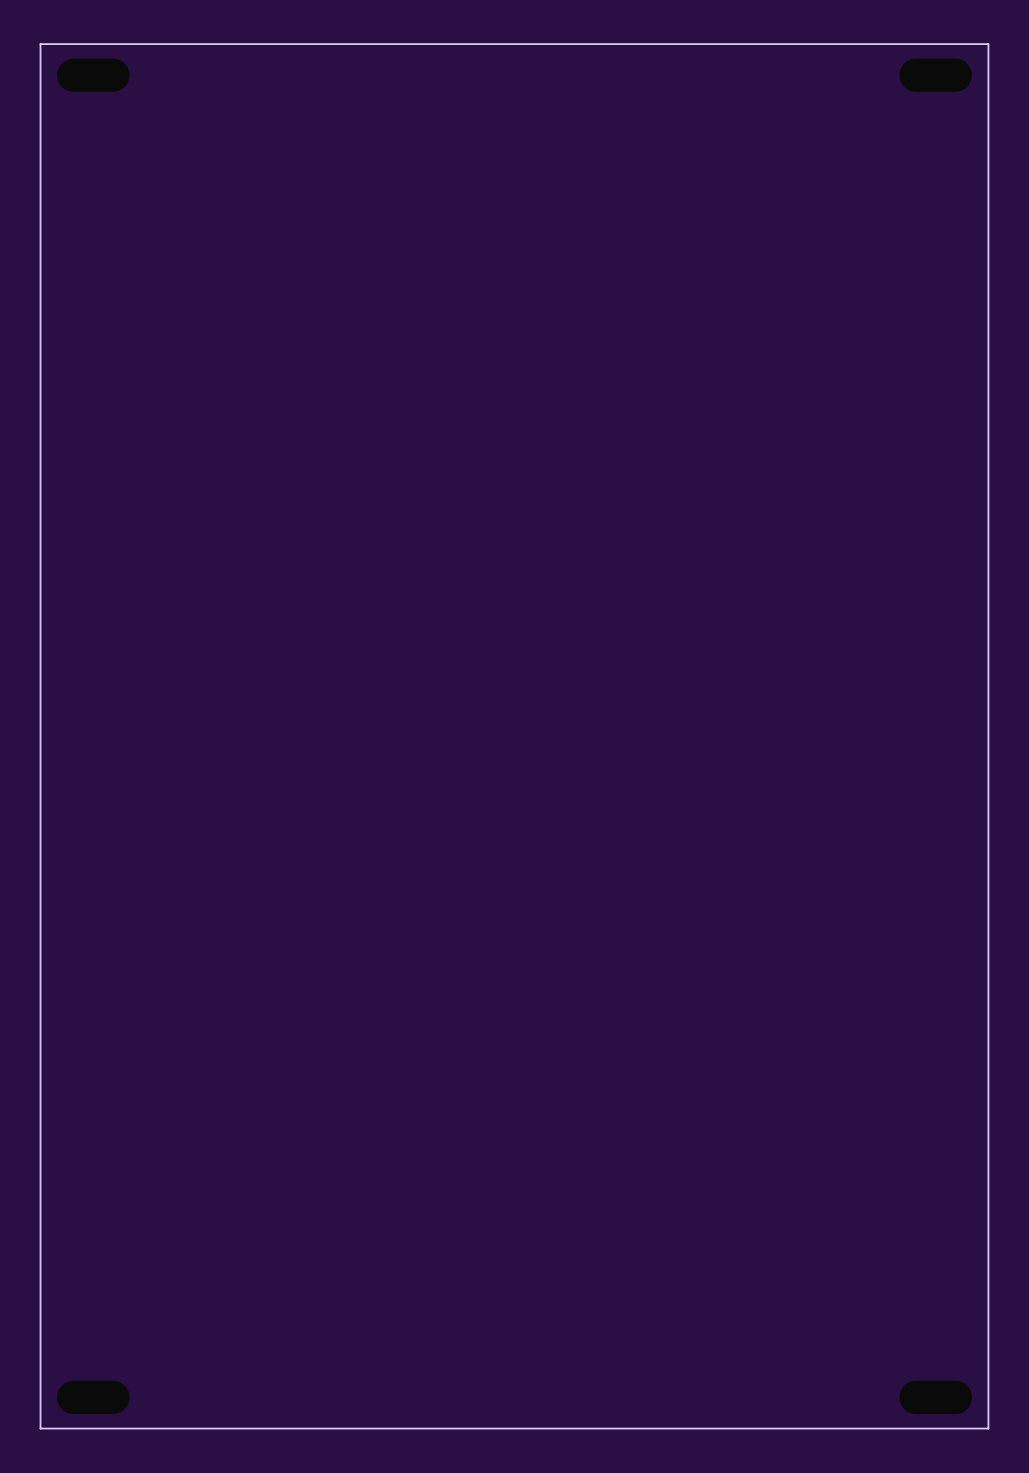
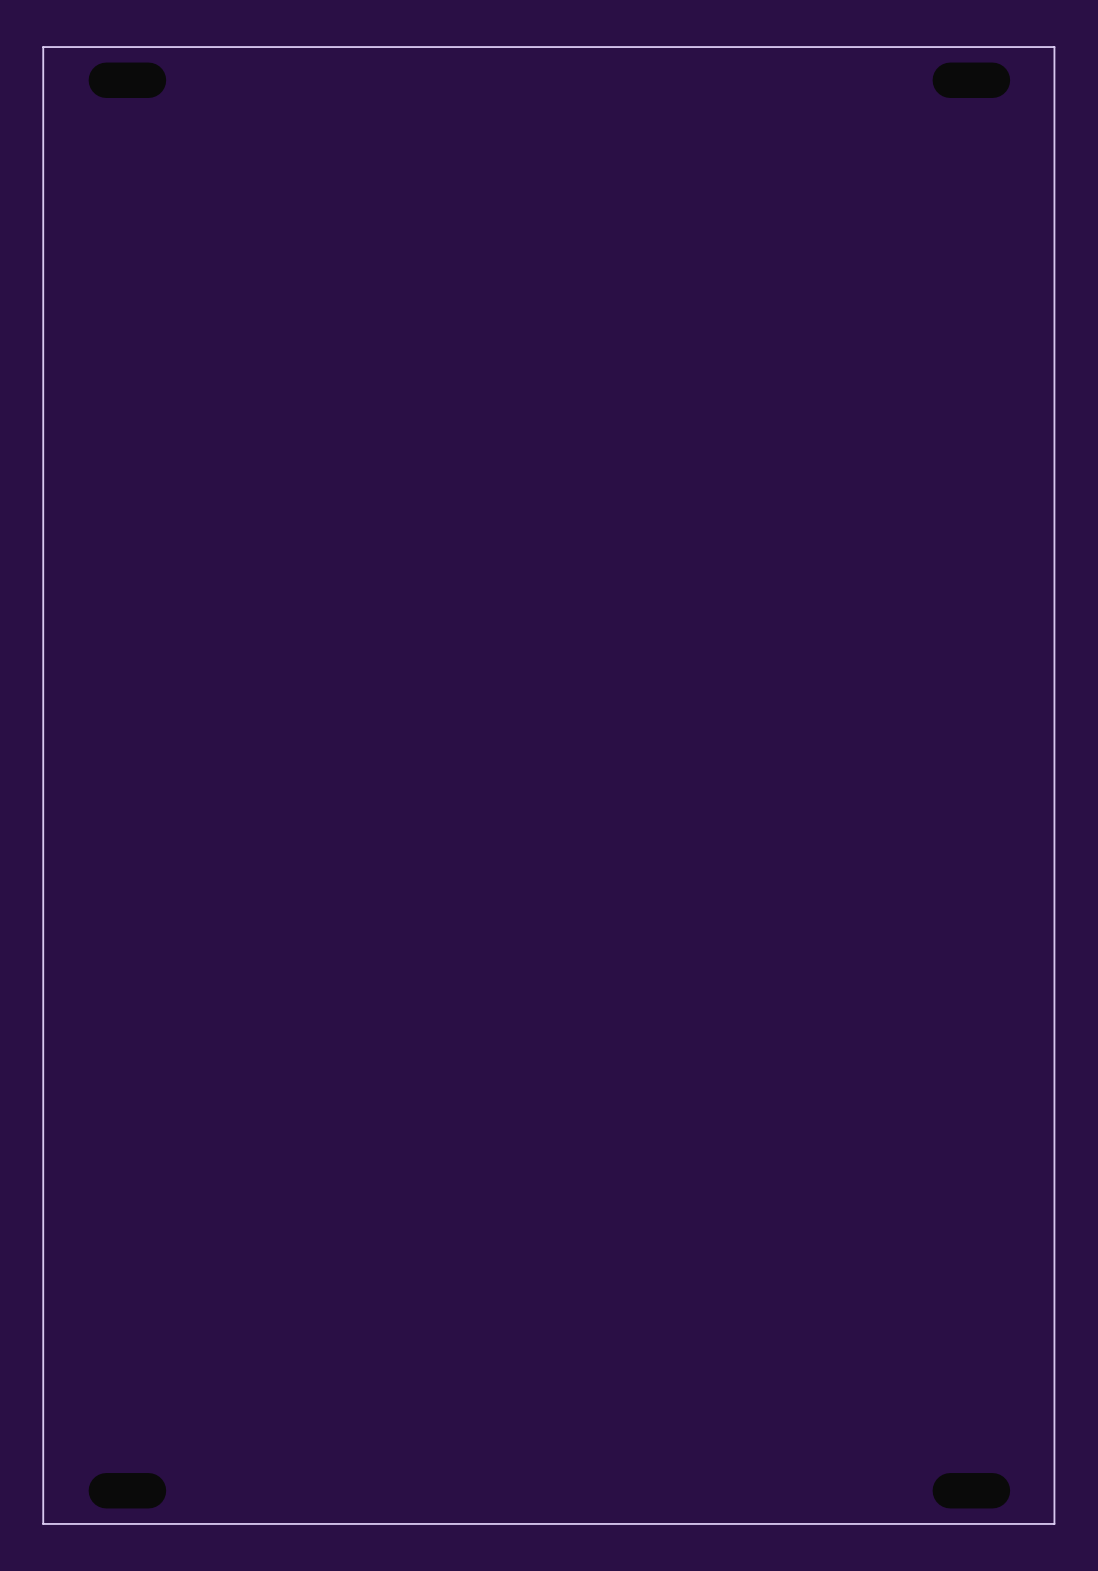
part position: (93, 75) -> (127, 80)
part position: (935, 75) -> (971, 80)
part position: (93, 1397) -> (127, 1490)
part position: (935, 1397) -> (971, 1490)

